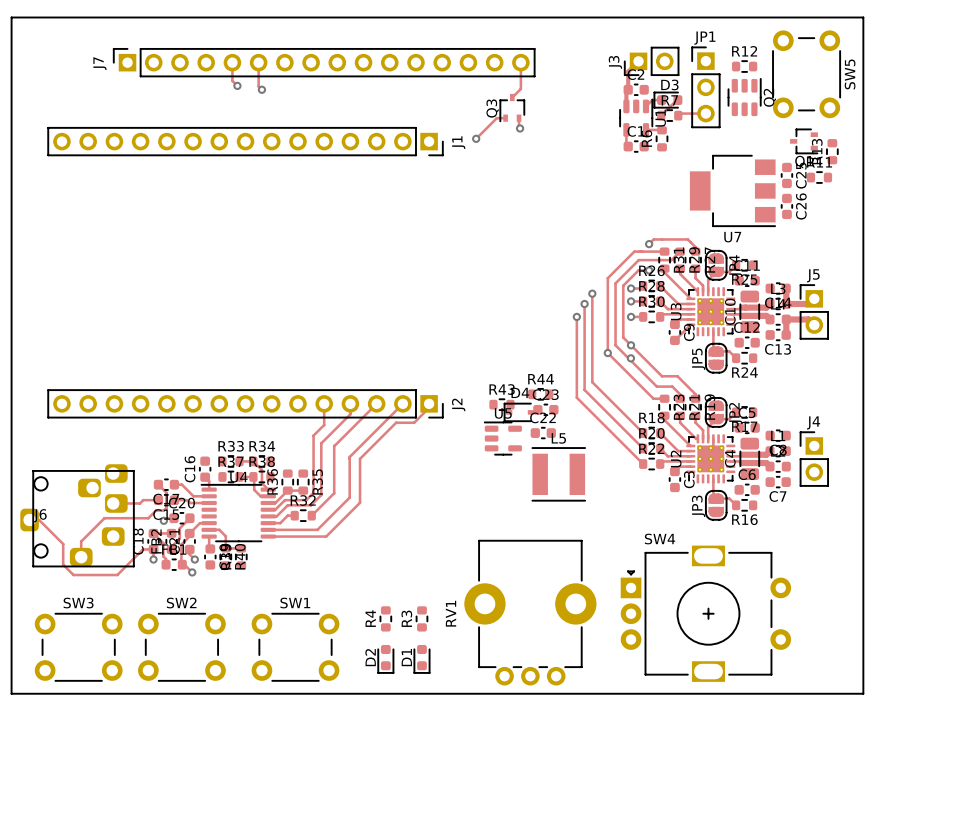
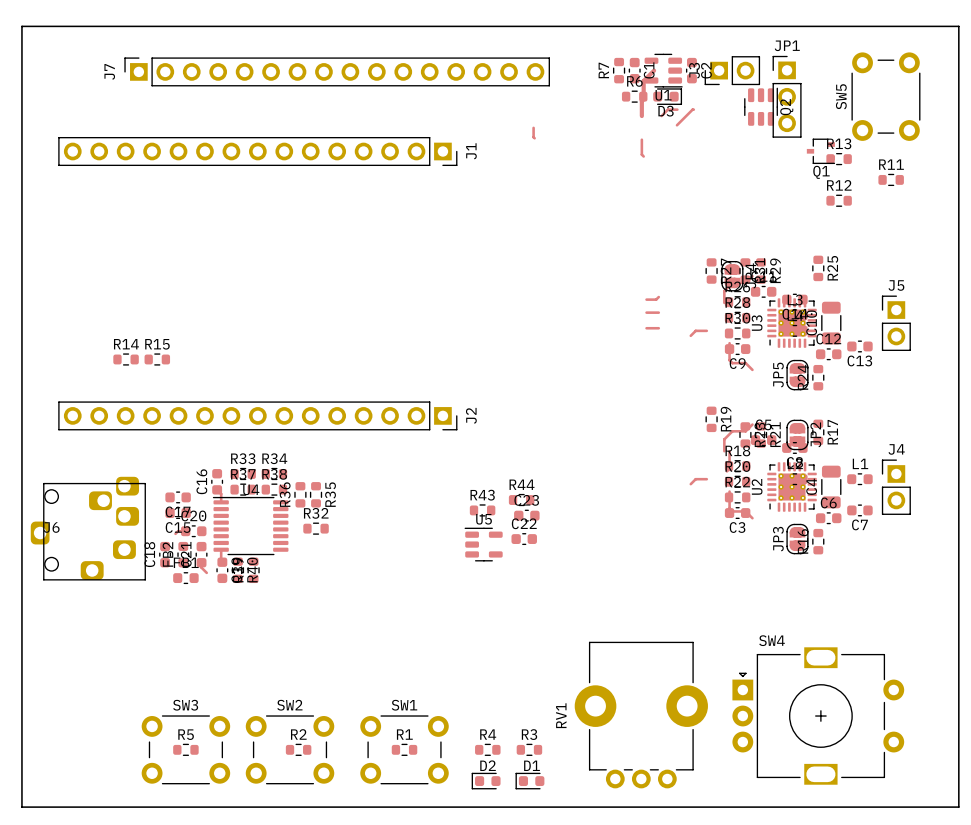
board edge: (863, 17) (863, 693) (11, 693) -> (880, 26) (958, 26) (958, 807) (21, 807) (21, 708)
J3 position: (651, 61) -> (732, 70)
track: (232, 62) (232, 80) (237, 85) -> none
track: (258, 62) (258, 86) (261, 89) -> none
track: (520, 62) (520, 88) (512, 97) -> none
R12 position: (744, 66) -> (839, 200)
SW5 position: (806, 74) -> (885, 96)
SW5 name position: SW5 (850, 74) -> SW5 (841, 96)
via: (237, 85) -> none
JP1 position: (705, 87) -> (787, 96)
via: (261, 89) -> none
C2 rotation: 0° (636, 89) -> 90° clockwise (691, 70)
C2 position: (636, 89) -> (691, 70)
D3 rotation: 0° (668, 100) -> 180° (667, 96)
D3 position: (668, 100) -> (667, 96)
R7 name position: R7 (669, 100) -> R7 (603, 70)
Q3: (512, 107) -> none
track: (705, 113) (680, 113) (678, 115) -> none
R7 rotation: 0° (669, 115) -> 90° clockwise (619, 70)
R7 position: (669, 115) -> (619, 70)
U1 rotation: 0° (636, 117) -> 90° clockwise (663, 70)
U1 position: (636, 117) -> (663, 70)
track: (505, 118) (496, 118) (476, 138) -> none
via: (520, 128) -> none
track: (646, 129) (662, 130) -> none
via: (476, 138) -> none
R6 rotation: 0° (662, 138) -> 90° clockwise (634, 96)
R6 position: (662, 138) -> (634, 96)
C1 rotation: 0° (636, 146) -> 90° clockwise (634, 70)
C1 position: (636, 146) -> (634, 70)
R13 rotation: 0° (832, 151) -> 90° clockwise (839, 159)
C25: (786, 175) -> none
R11 position: (819, 177) -> (891, 179)
U7: (732, 190) -> none
C26: (786, 206) -> none
track: (649, 244) (653, 239) (687, 239) (695, 247) (695, 251) -> none
via: (649, 244) -> none
track: (664, 251) (634, 251) (607, 278) (607, 353) (653, 398) (664, 398) -> none
track: (680, 251) (671, 260) (638, 260) (615, 283) (615, 345) (656, 386) (672, 386) (680, 394) (680, 398) -> none
R31 position: (664, 260) -> (745, 271)
R29 position: (680, 260) -> (761, 271)
R25 rotation: 0° (744, 265) -> 90° clockwise (818, 268)
R25 position: (744, 265) -> (818, 268)
track: (664, 268) (664, 272) (690, 298) -> none
track: (680, 268) (680, 273) (697, 291) -> none
track: (695, 268) (695, 278) (703, 285) (703, 291) -> none
track: (649, 270) (638, 270) (623, 285) (623, 337) (662, 376) (677, 376) (695, 394) (695, 398) -> none
via: (649, 270) -> none
R25 name position: R25 (744, 279) -> R25 (832, 268)
R26 position: (651, 285) -> (737, 302)
track: (660, 285) (678, 304) (690, 304) -> none
via: (631, 288) -> none
track: (786, 288) (786, 304) (809, 304) (814, 298) -> none
track: (592, 293) (592, 382) (643, 433) -> none
via: (592, 293) -> none
via: (631, 301) -> none
R28 position: (651, 301) -> (737, 317)
track: (660, 301) (667, 309) (690, 309) -> none
track: (584, 304) (584, 389) (643, 448) -> none
via: (584, 304) -> none
track: (770, 304) (766, 307) (730, 309) -> none
U3 position: (710, 311) -> (792, 323)
C10 position: (749, 311) -> (831, 323)
J5 position: (814, 311) -> (896, 323)
track: (690, 314) (662, 314) (660, 316) -> none
track: (730, 314) (766, 315) (770, 319) -> none
track: (576, 316) (576, 397) (643, 464) -> none
via: (576, 316) -> none
via: (631, 316) -> none
R30 position: (651, 316) -> (737, 333)
track: (690, 324) (675, 340) -> none
track: (814, 325) (808, 319) (786, 319) (786, 334) -> none
C9 rotation: 0° (674, 332) -> 90° clockwise (737, 349)
C9 position: (674, 332) -> (737, 349)
C13 position: (778, 334) -> (859, 346)
C12 position: (747, 342) -> (828, 354)
via: (631, 345) -> none
R14: none -> (126, 359)
R15: none -> (157, 359)
via: (607, 353) -> none
via: (630, 358) -> none
JP5 position: (716, 358) -> (797, 375)
R24 rotation: 0° (744, 358) -> 90° clockwise (818, 377)
R24 position: (744, 358) -> (818, 377)
R44 position: (540, 394) -> (521, 500)
track: (324, 403) (324, 425) (313, 435) (313, 492) (306, 500) (284, 500) (275, 509) (268, 509) -> none
track: (350, 403) (350, 414) (321, 443) (321, 495) (310, 505) (287, 505) (276, 516) (268, 516) -> none
track: (376, 403) (334, 445) (334, 493) (311, 515) -> none
track: (402, 403) (349, 457) (349, 497) (317, 529) (268, 529) -> none
track: (429, 403) (429, 407) (414, 422) (396, 422) (360, 458) (360, 502) (326, 536) (268, 536) -> none
R43 position: (501, 404) -> (482, 510)
R23 position: (664, 407) -> (745, 434)
R21 position: (680, 407) -> (761, 434)
C23 position: (545, 409) -> (526, 515)
D4: (518, 412) -> none
JP2 position: (716, 412) -> (797, 434)
R17 rotation: 0° (744, 412) -> 90° clockwise (818, 432)
R17 position: (744, 412) -> (818, 432)
track: (664, 415) (664, 420) (690, 445) -> none
track: (680, 415) (680, 422) (697, 438) -> none
track: (695, 415) (695, 422) (703, 430) (703, 438) -> none
R17 name position: R17 (744, 426) -> R17 (832, 432)
C22 position: (543, 433) -> (524, 539)
R18 position: (651, 433) -> (737, 466)
track: (660, 433) (678, 451) (690, 451) -> none
U5 position: (503, 438) -> (483, 544)
R20 position: (651, 448) -> (737, 481)
track: (660, 448) (667, 456) (690, 456) -> none
track: (770, 451) (766, 454) (730, 456) -> none
L1 position: (778, 451) -> (859, 479)
U2 position: (710, 458) -> (792, 487)
C4 position: (749, 458) -> (831, 487)
J4 position: (814, 459) -> (896, 487)
track: (239, 461) (253, 461) (261, 469) (261, 483) (268, 489) -> none
track: (690, 461) (662, 461) (660, 464) -> none
track: (730, 461) (766, 463) (770, 466) -> none
R22 position: (651, 464) -> (737, 497)
L5: (558, 474) -> none
track: (239, 476) (253, 476) (254, 489) (260, 496) (268, 496) -> none
C3 rotation: 0° (674, 479) -> 90° clockwise (737, 513)
C3 position: (674, 479) -> (737, 513)
C7 position: (778, 482) -> (859, 510)
track: (158, 484) (166, 492) (166, 507) (163, 510) (156, 510) (148, 518) (104, 518) (81, 541) (81, 557) -> none
track: (174, 484) (181, 484) (193, 496) (209, 496) -> none
C6 position: (747, 489) -> (828, 518)
track: (303, 490) (287, 490) (275, 503) (268, 503) -> none
track: (158, 500) (143, 500) (139, 503) (113, 503) -> none
track: (174, 500) (187, 500) (189, 503) (209, 503) -> none
JP3 position: (716, 505) -> (797, 539)
R16 rotation: 0° (744, 505) -> 90° clockwise (818, 541)
R16 position: (744, 505) -> (818, 541)
track: (294, 515) (287, 515) (280, 523) (268, 523) -> none
track: (189, 518) (179, 528) (179, 538) (171, 546) (171, 549) -> none
track: (29, 519) (39, 519) (63, 544) (63, 564) (73, 575) (117, 575) (142, 549) (153, 549) (153, 559) -> none
via: (163, 520) -> none
track: (209, 523) (200, 523) (181, 544) (181, 563) (192, 572) -> none
track: (209, 529) (219, 529) (225, 536) (225, 548) (241, 548) -> none
track: (171, 533) (153, 533) (163, 543) (163, 556) (166, 559) (166, 564) -> none
via: (153, 559) -> none
via: (194, 559) -> none
via: (192, 572) -> none
RV1 position: (530, 612) -> (641, 715)
SW4 position: (705, 613) -> (818, 716)
R4 rotation: 0° (385, 618) -> 90° clockwise (487, 749)
R4 position: (385, 618) -> (487, 749)
R3 rotation: 0° (421, 618) -> 90° clockwise (529, 749)
R3 position: (421, 618) -> (529, 749)
SW3 position: (78, 647) -> (185, 749)
SW2 position: (181, 647) -> (290, 749)
SW1 position: (295, 647) -> (404, 749)
D2 rotation: 0° (385, 659) -> 90° clockwise (486, 781)
D2 position: (385, 659) -> (486, 781)
D1 rotation: 0° (421, 659) -> 90° clockwise (529, 781)
D1 position: (421, 659) -> (529, 781)
R5: none -> (185, 749)
R2: none -> (298, 749)
R1: none -> (404, 749)

